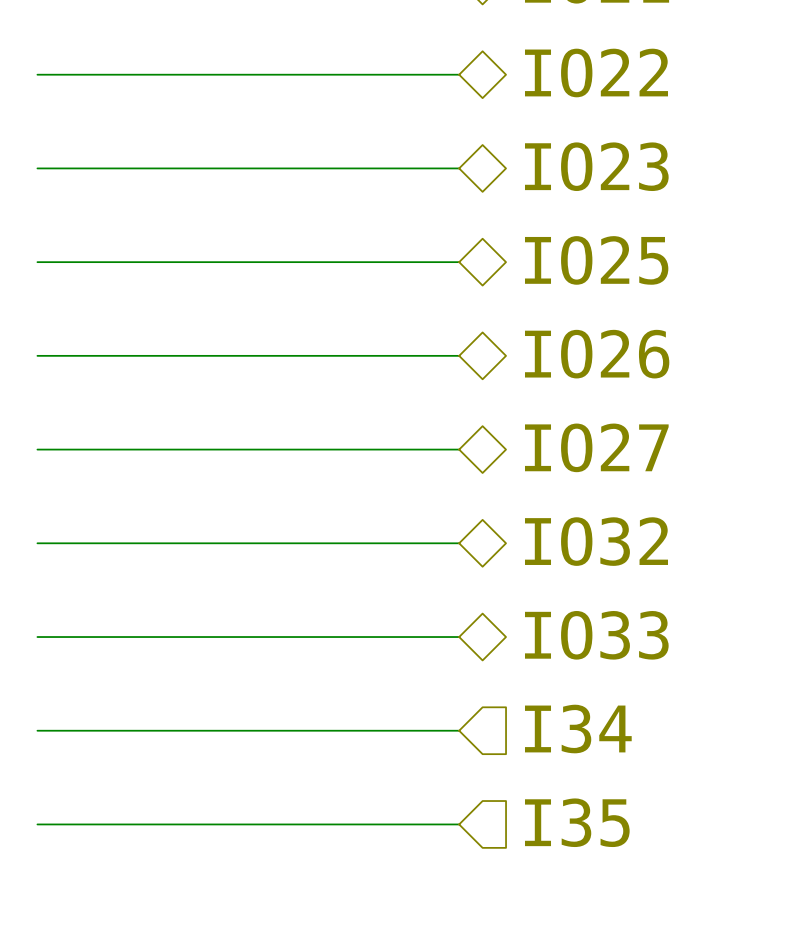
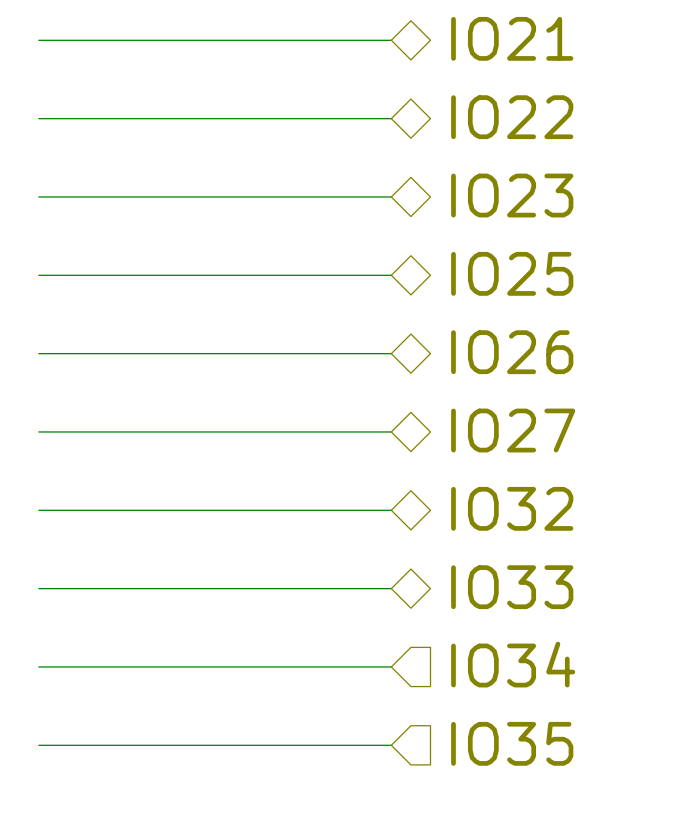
hierarchical label: I34 (578, 729) -> IO34 (513, 664)
hierarchical label: I35 (577, 822) -> IO35 (512, 743)

